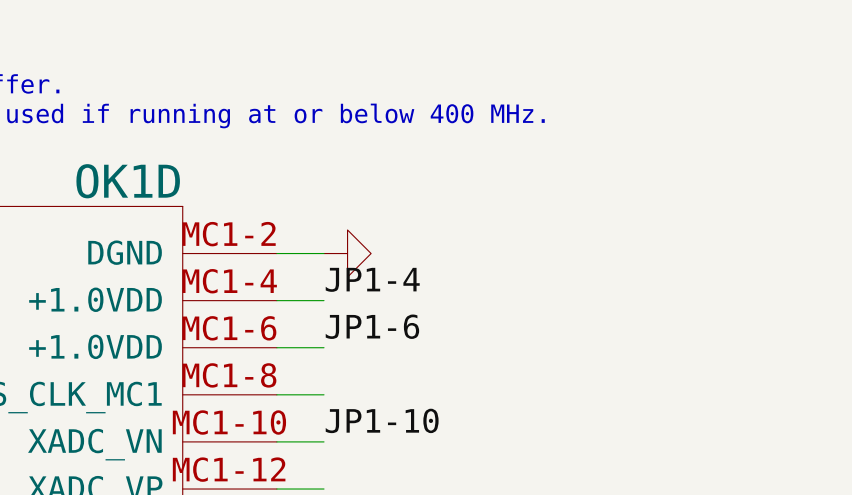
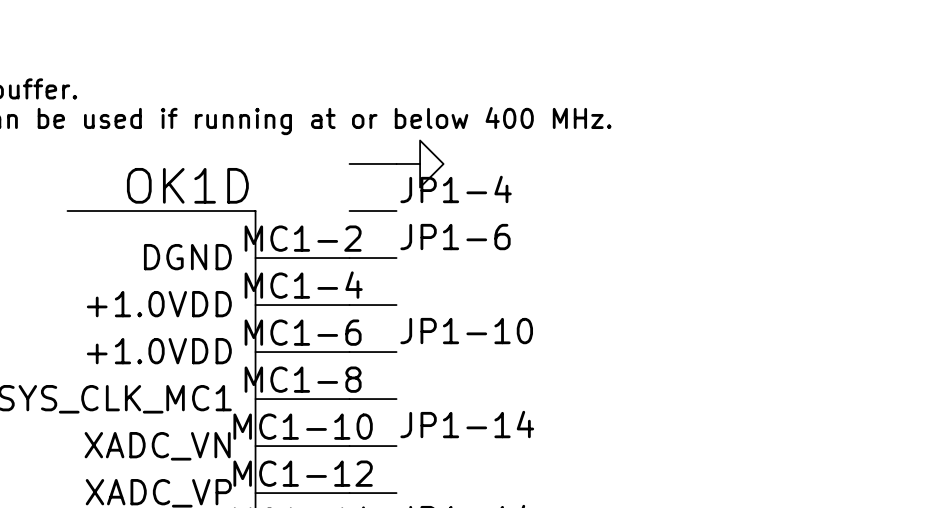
wire: none -> (349, 163) (396, 163)
wire: none -> (349, 211) (396, 211)
label: none -> JP1-6 (455, 237)
power symbol position: (347, 253) -> (420, 163)
label position: JP1-4 (372, 279) -> JP1-4 (456, 189)
label: JP1-6 (372, 326) -> JP1-10 (466, 331)
label: JP1-10 (382, 420) -> JP1-14 (467, 424)

